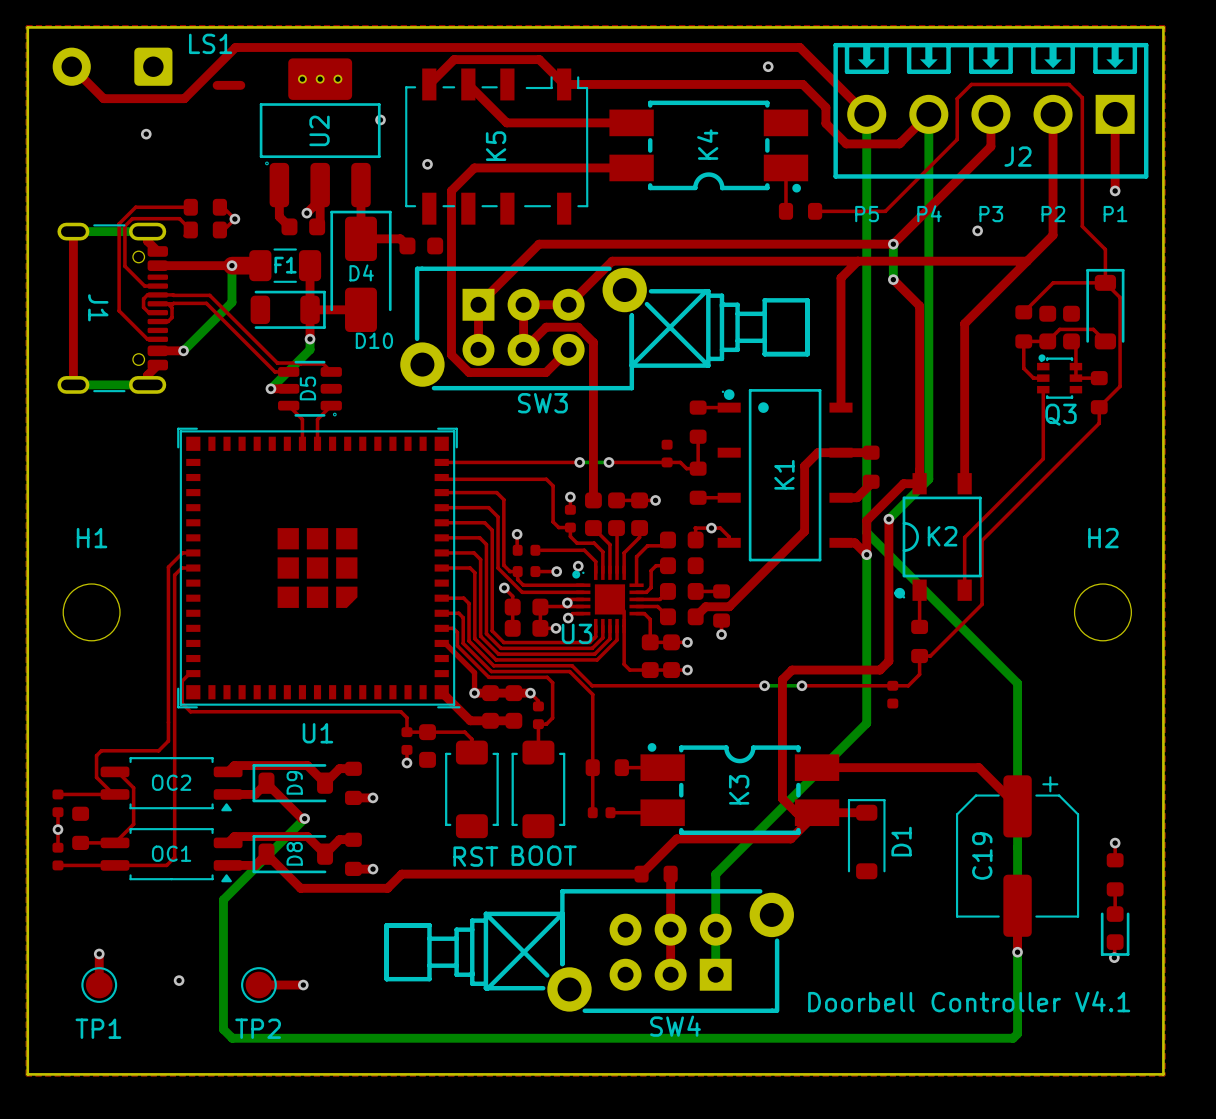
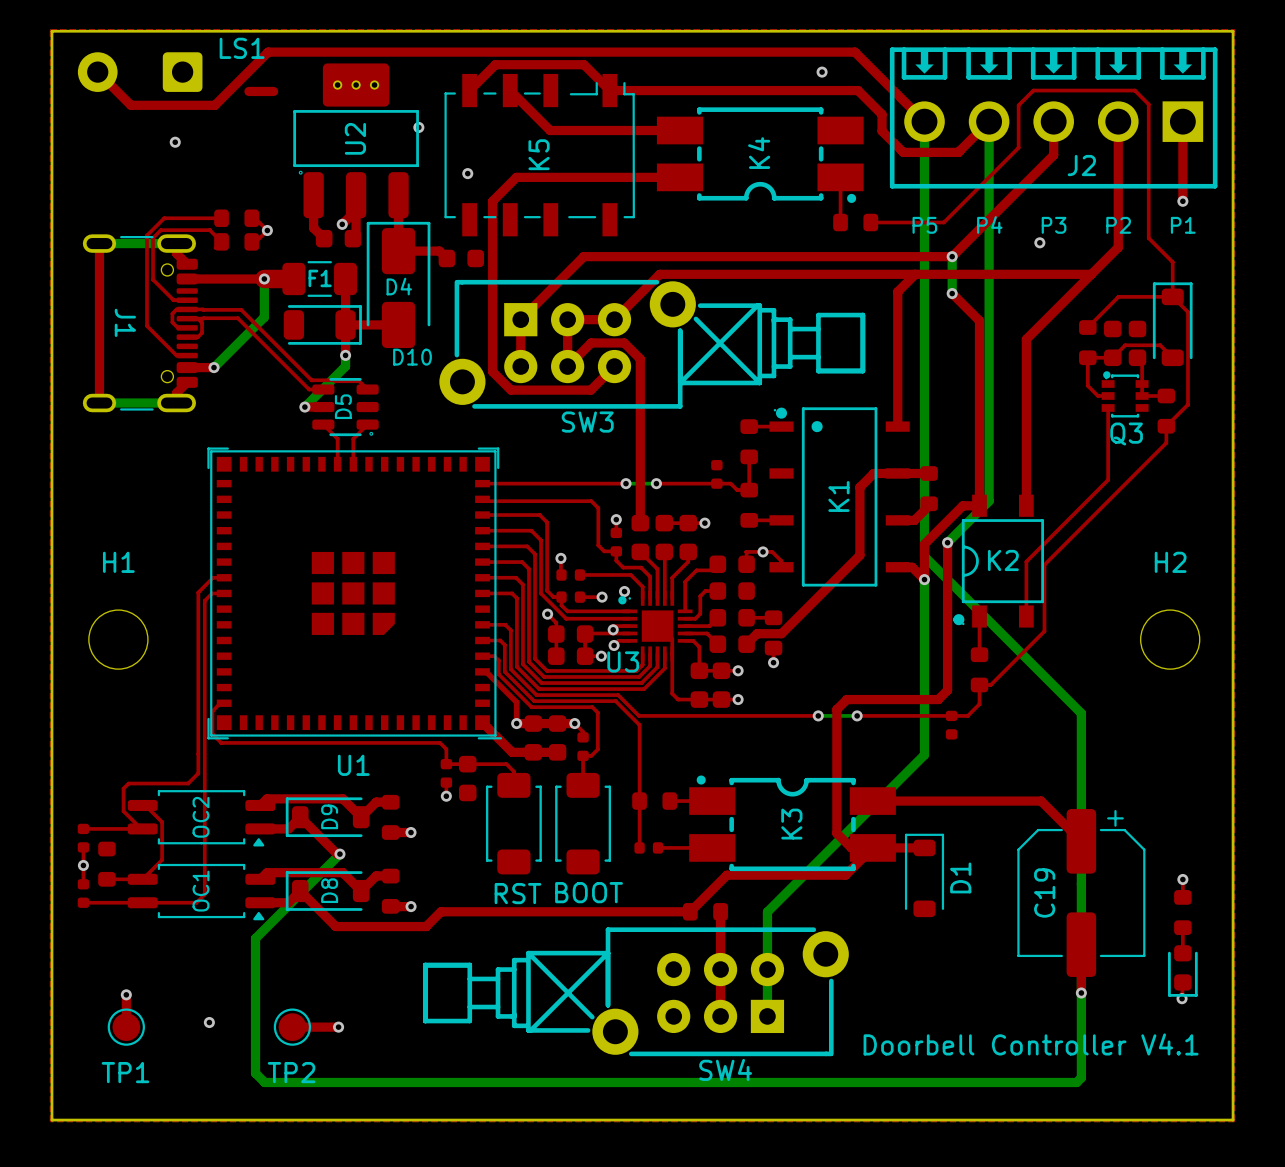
OC2 name rotation: 0° (171, 782) -> 90° counterclockwise (200, 817)
OC1 name rotation: 0° (171, 853) -> 90° counterclockwise (200, 891)

